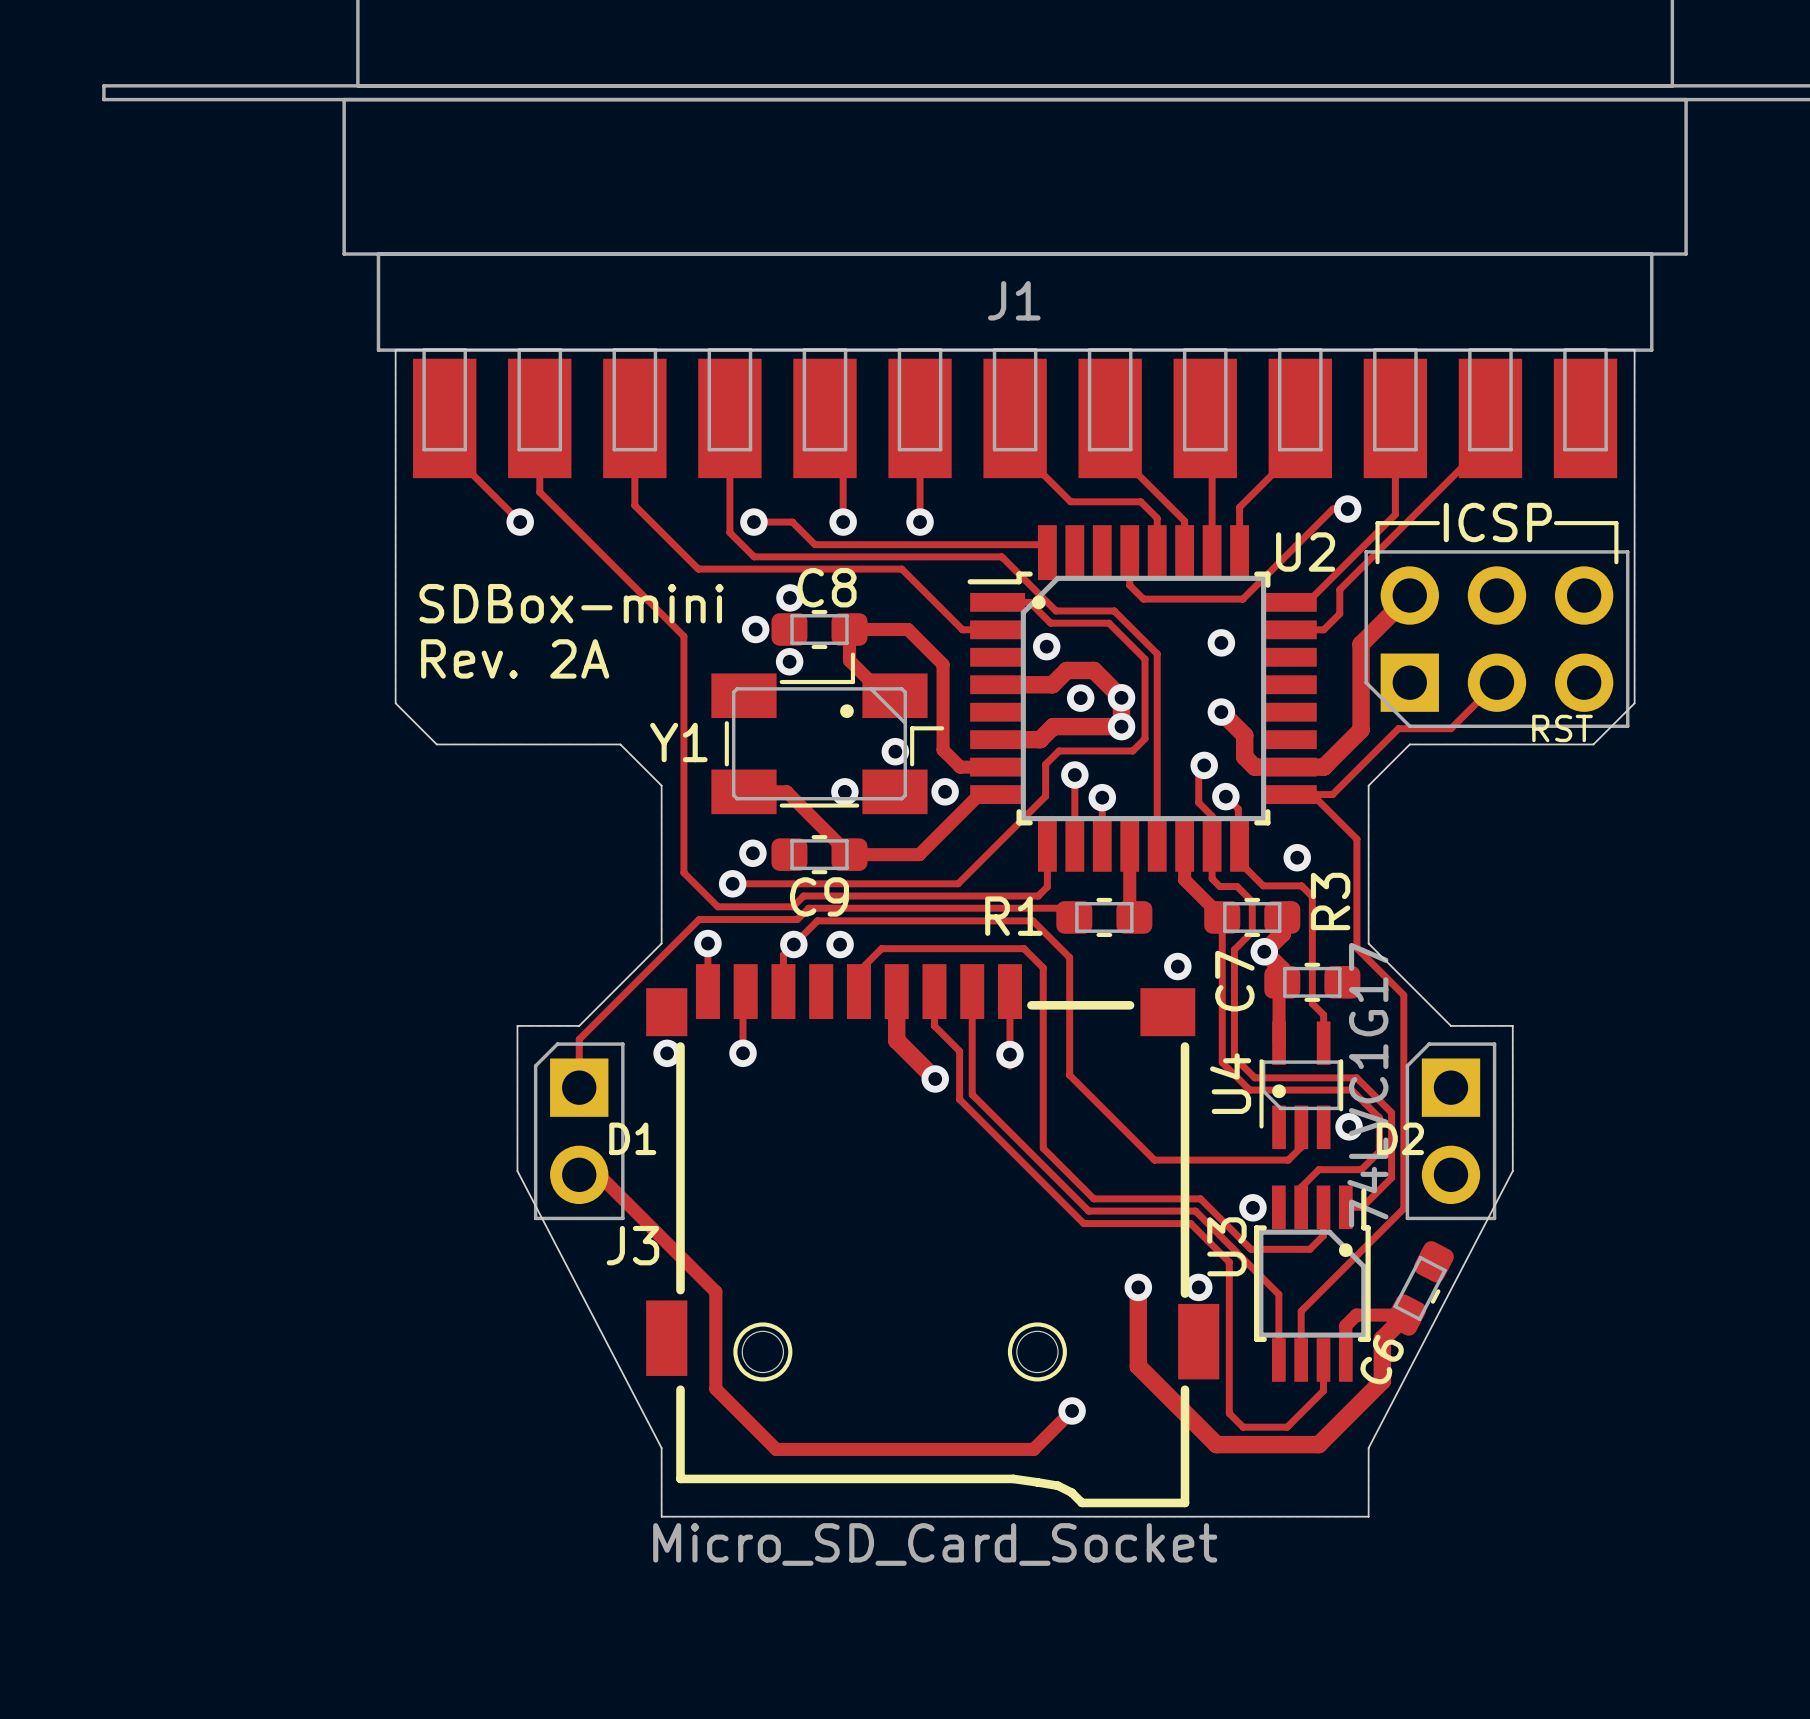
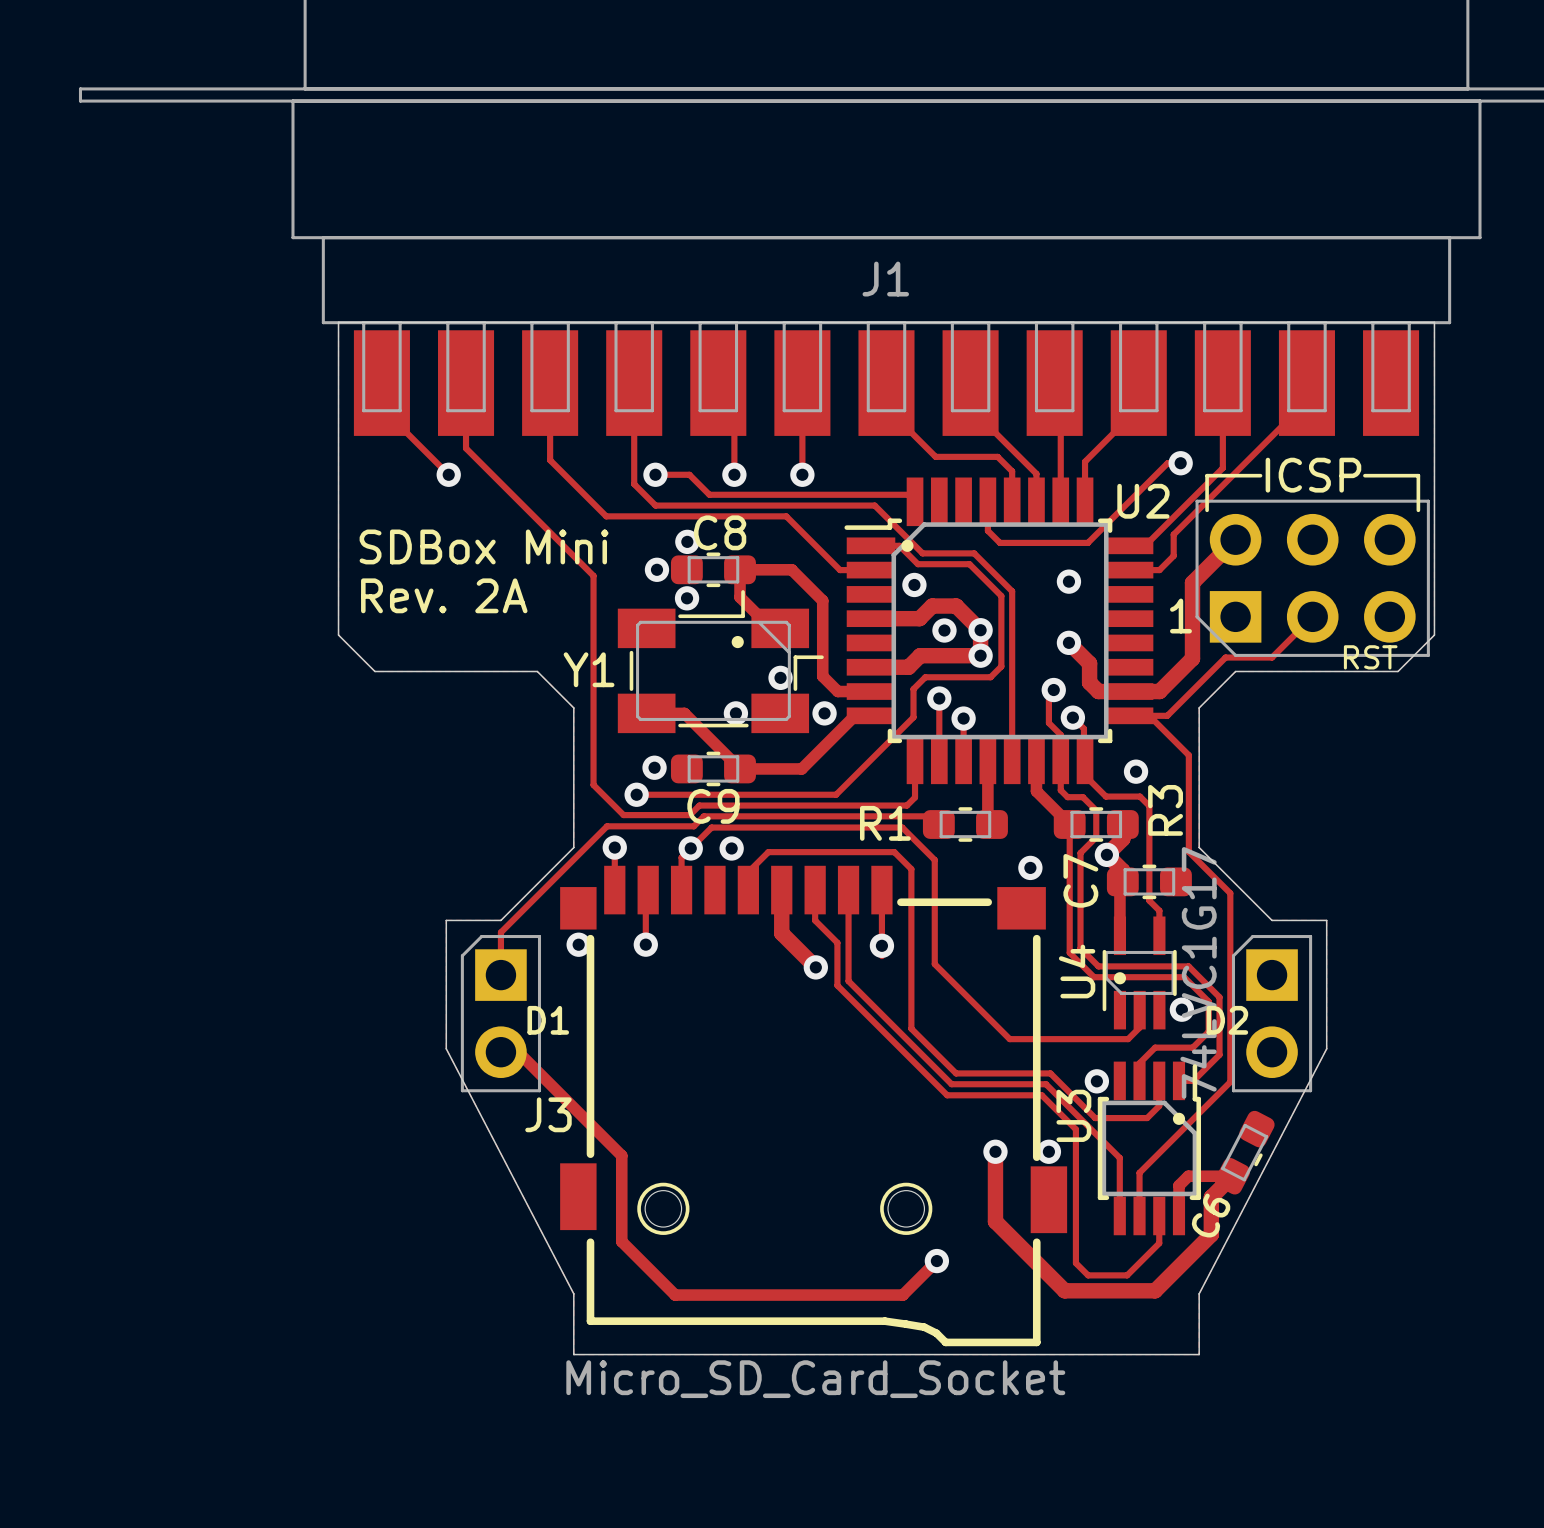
text: SDBox-mini (571, 603) -> SDBox Mini (484, 546)
text: none -> 1 (1180, 616)

